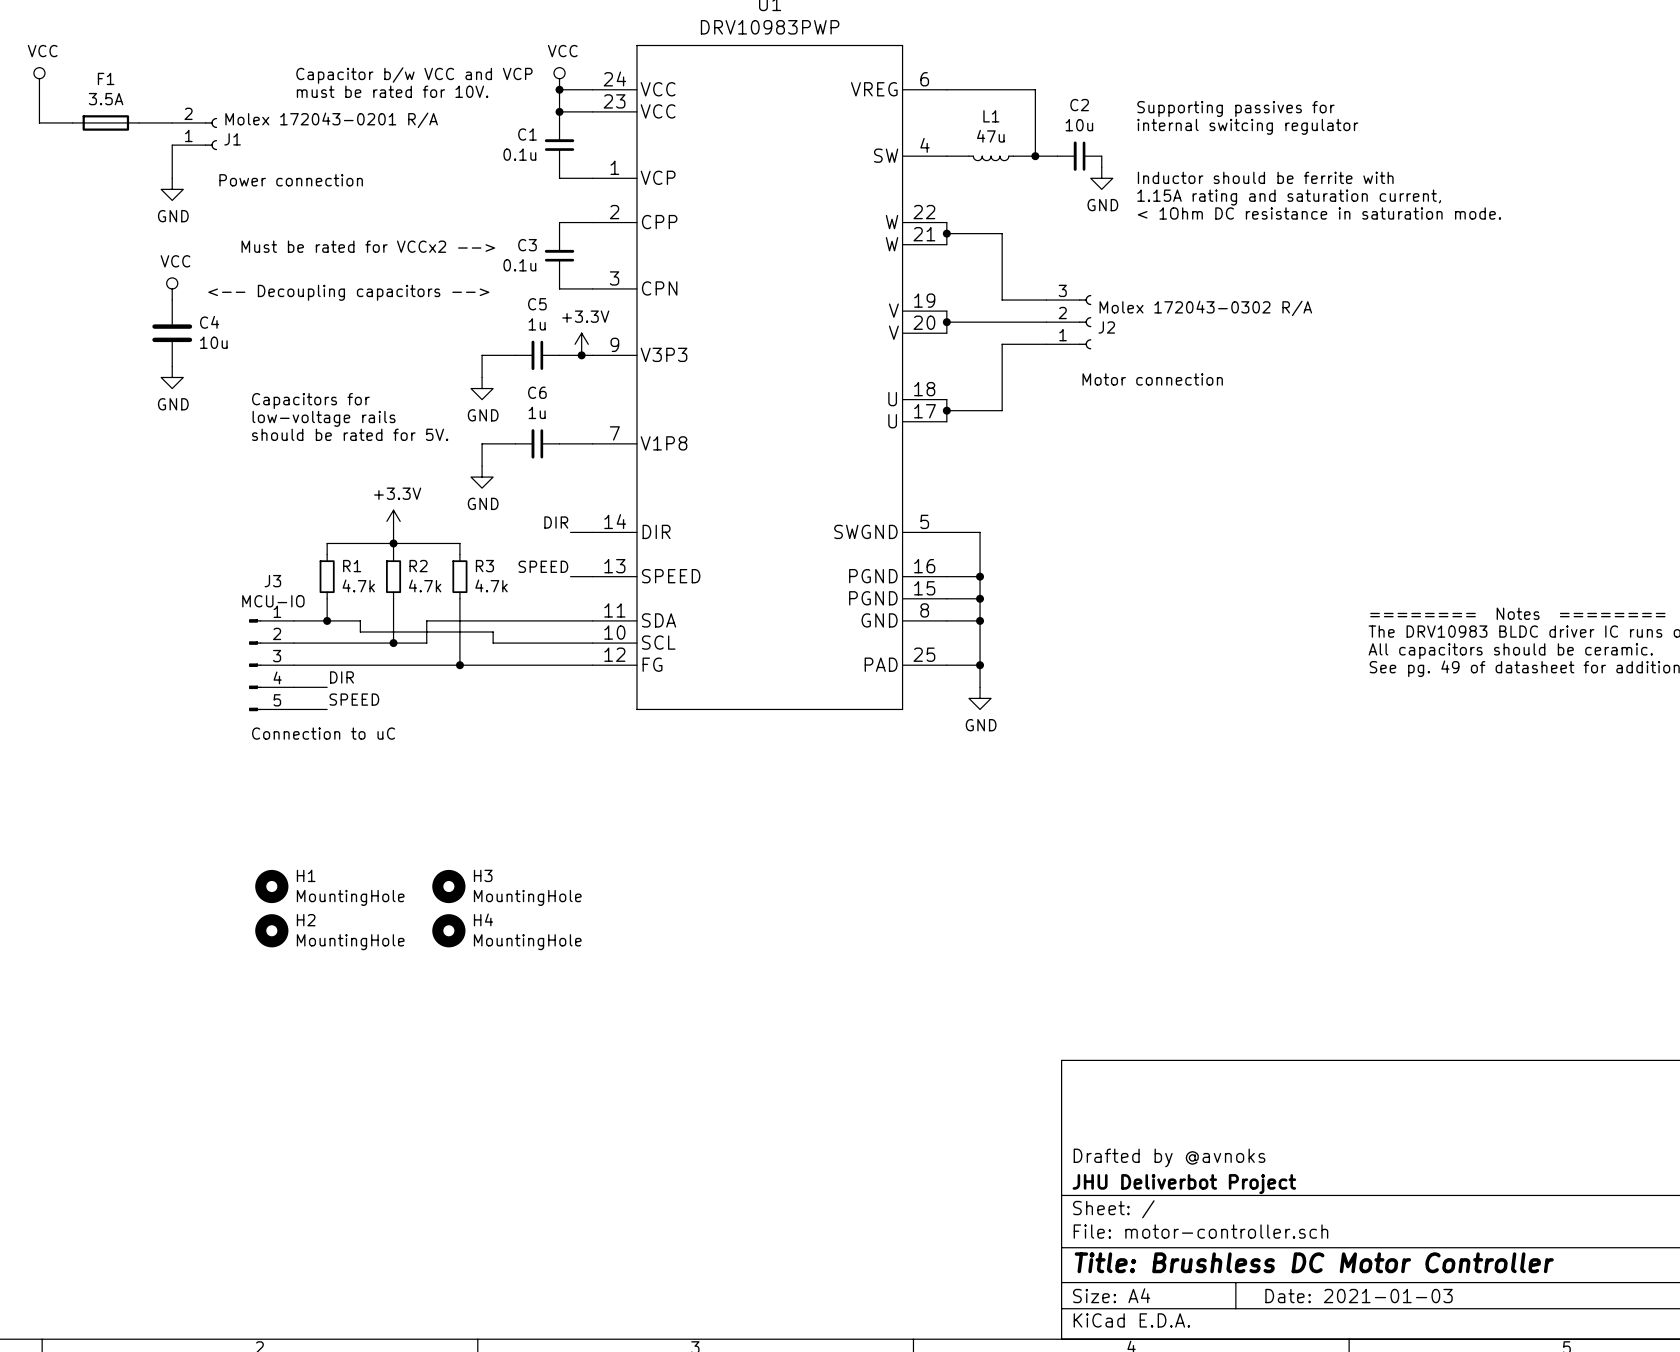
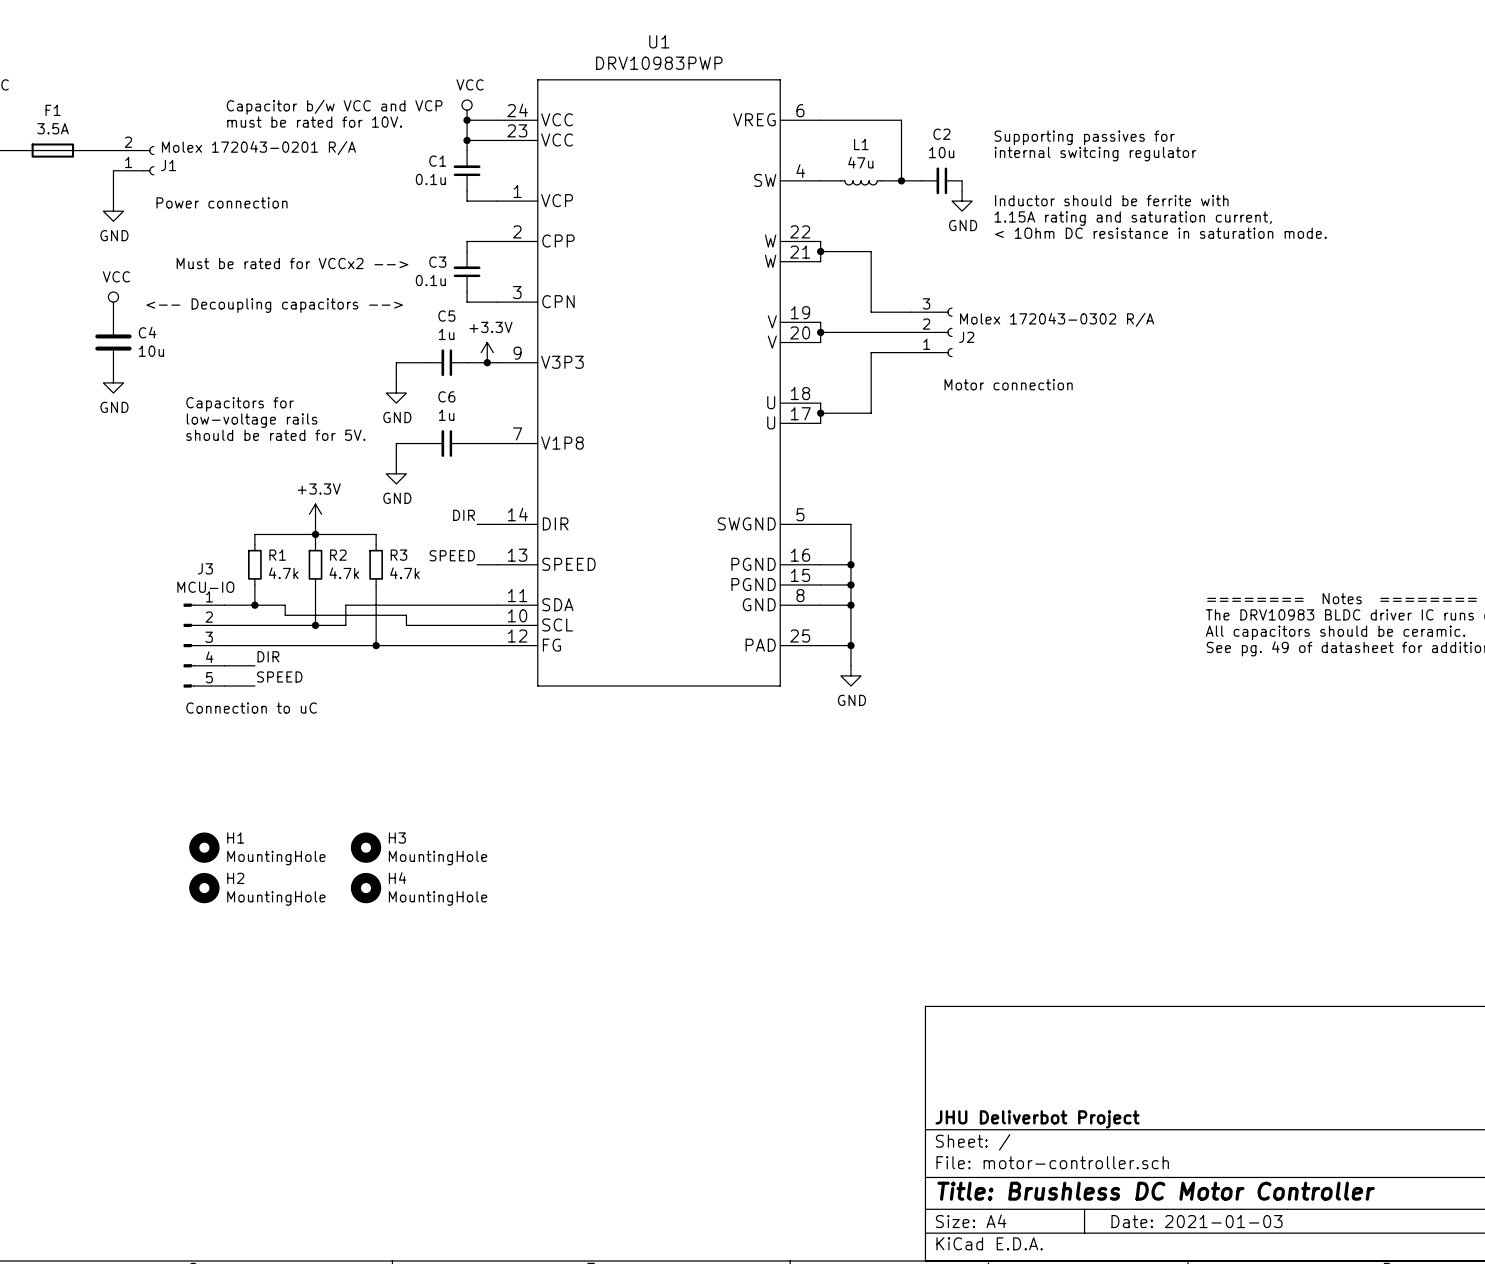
title block: Drafted by @avnoks (1169, 1157) -> none

